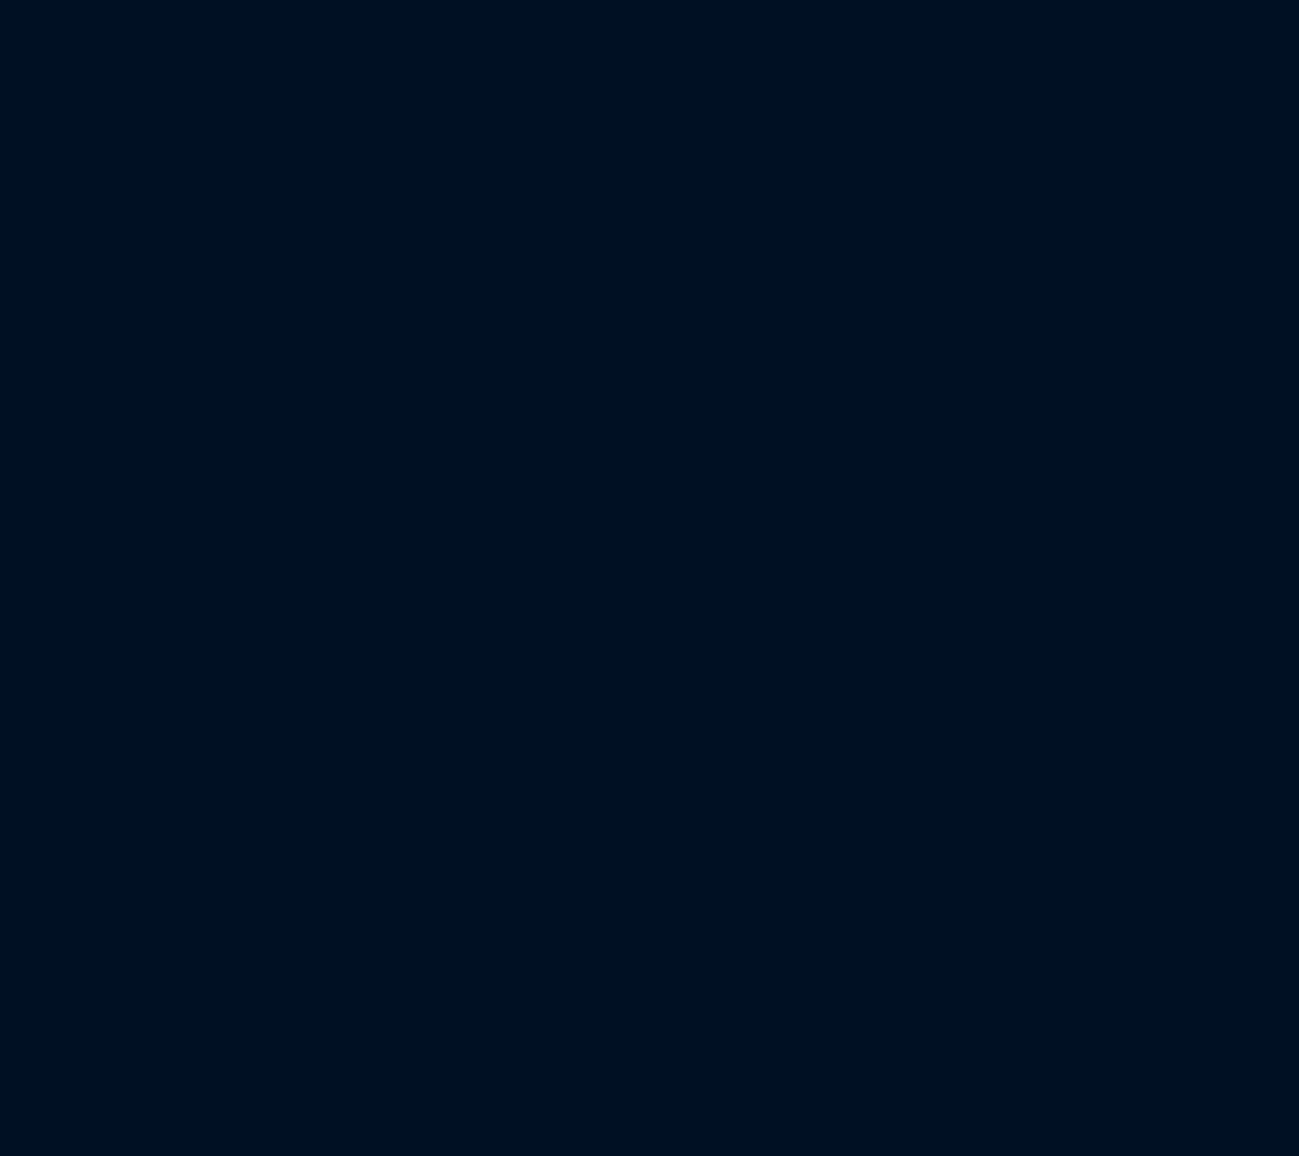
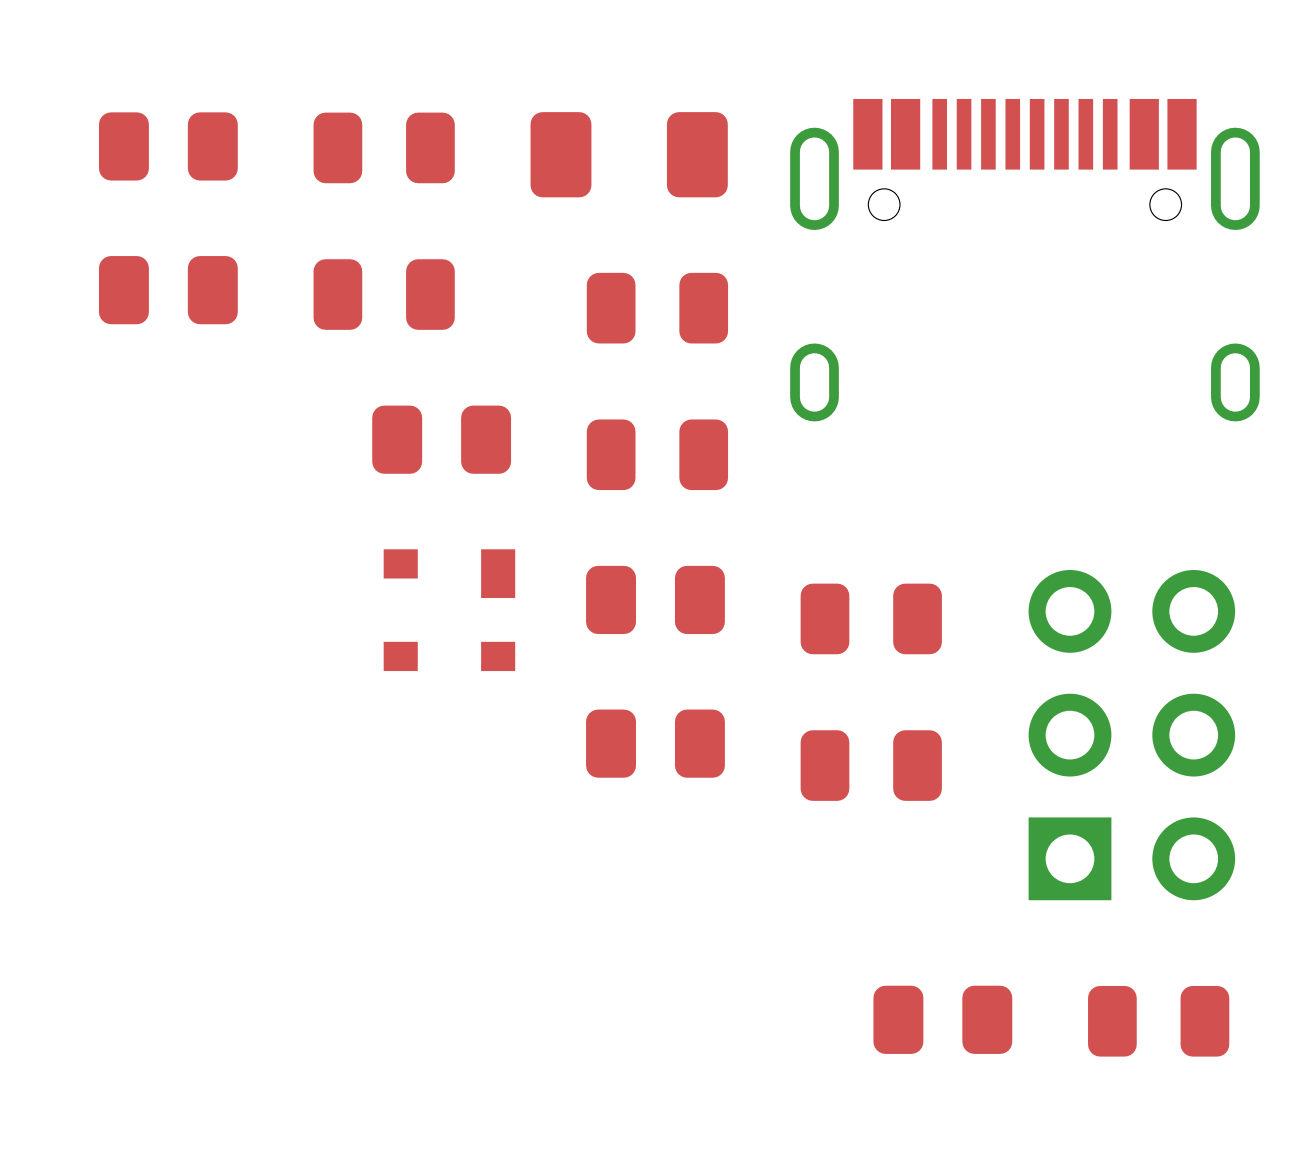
part: none -> (168, 146)
part: none -> (384, 147)
part: none -> (629, 154)
part: none -> (1024, 260)
part: none -> (168, 290)
part: none -> (384, 294)
part: none -> (657, 308)
part: none -> (441, 439)
part: none -> (657, 454)
part: none -> (655, 599)
part: none -> (449, 610)
part: none -> (871, 618)
part: none -> (1131, 735)
part: none -> (655, 743)
part: none -> (871, 765)
part: none -> (942, 1019)
part: none -> (1158, 1021)

